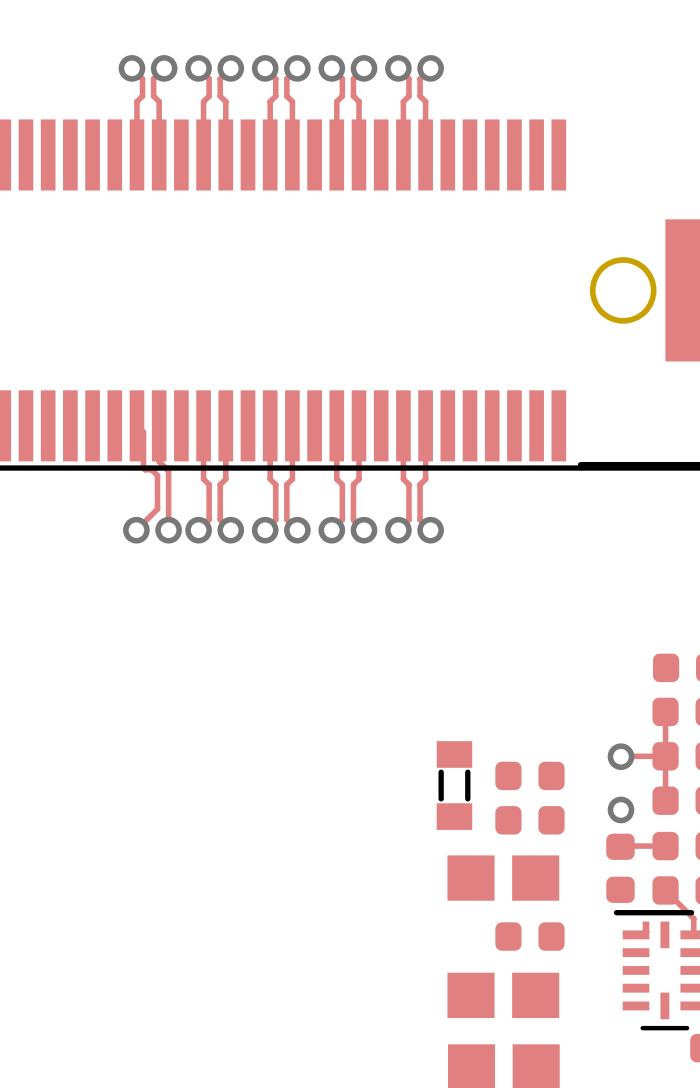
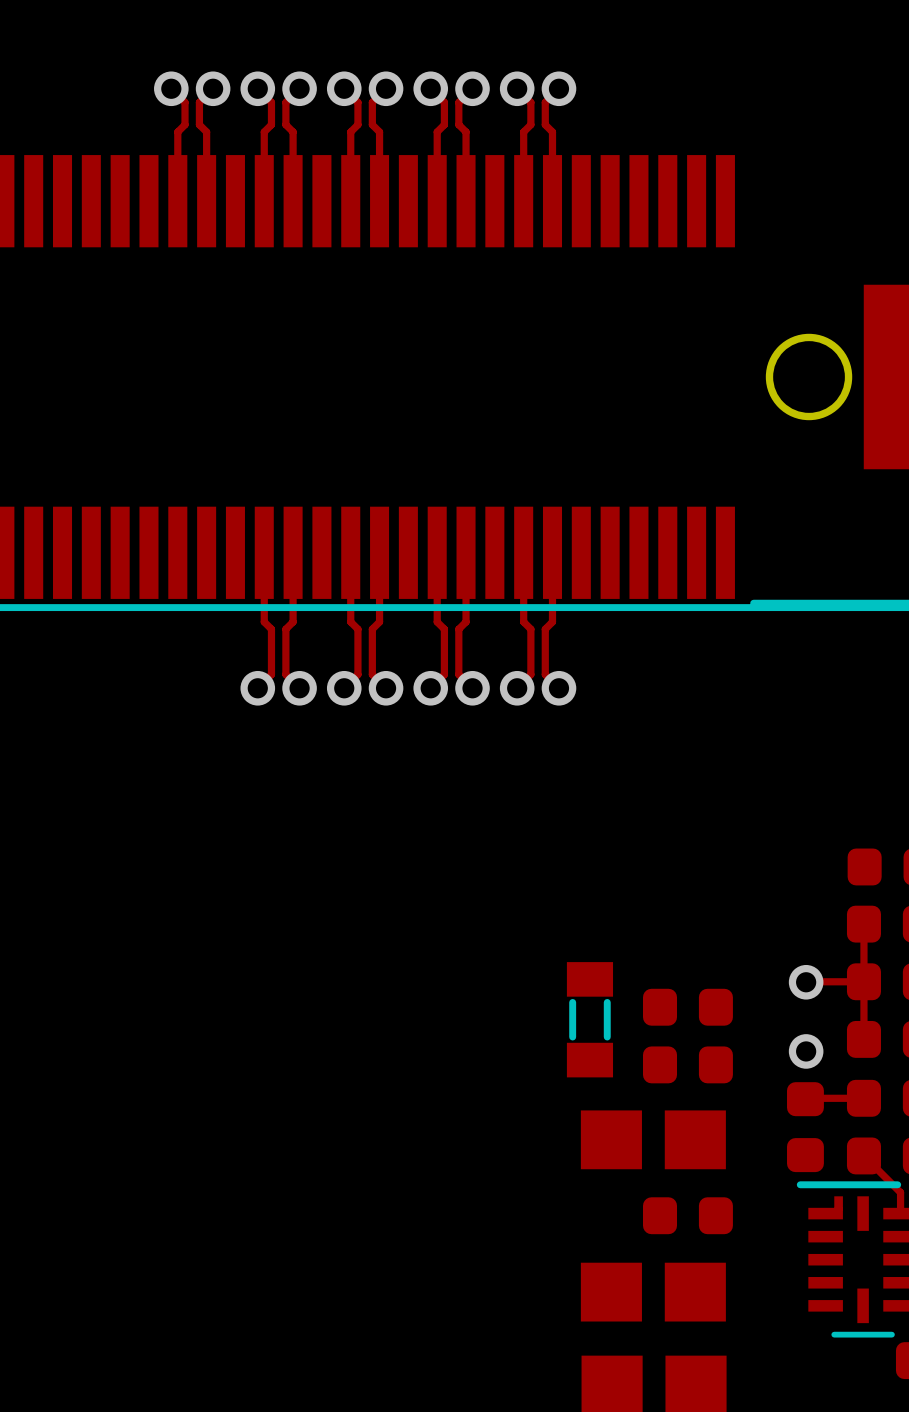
track: (136, 425) (143, 432) (143, 468) (151, 469) (157, 475) (157, 509) (136, 530) -> none
track: (159, 425) (159, 461) (168, 469) (168, 530) -> none
via: (136, 530) -> none
via: (168, 530) -> none

